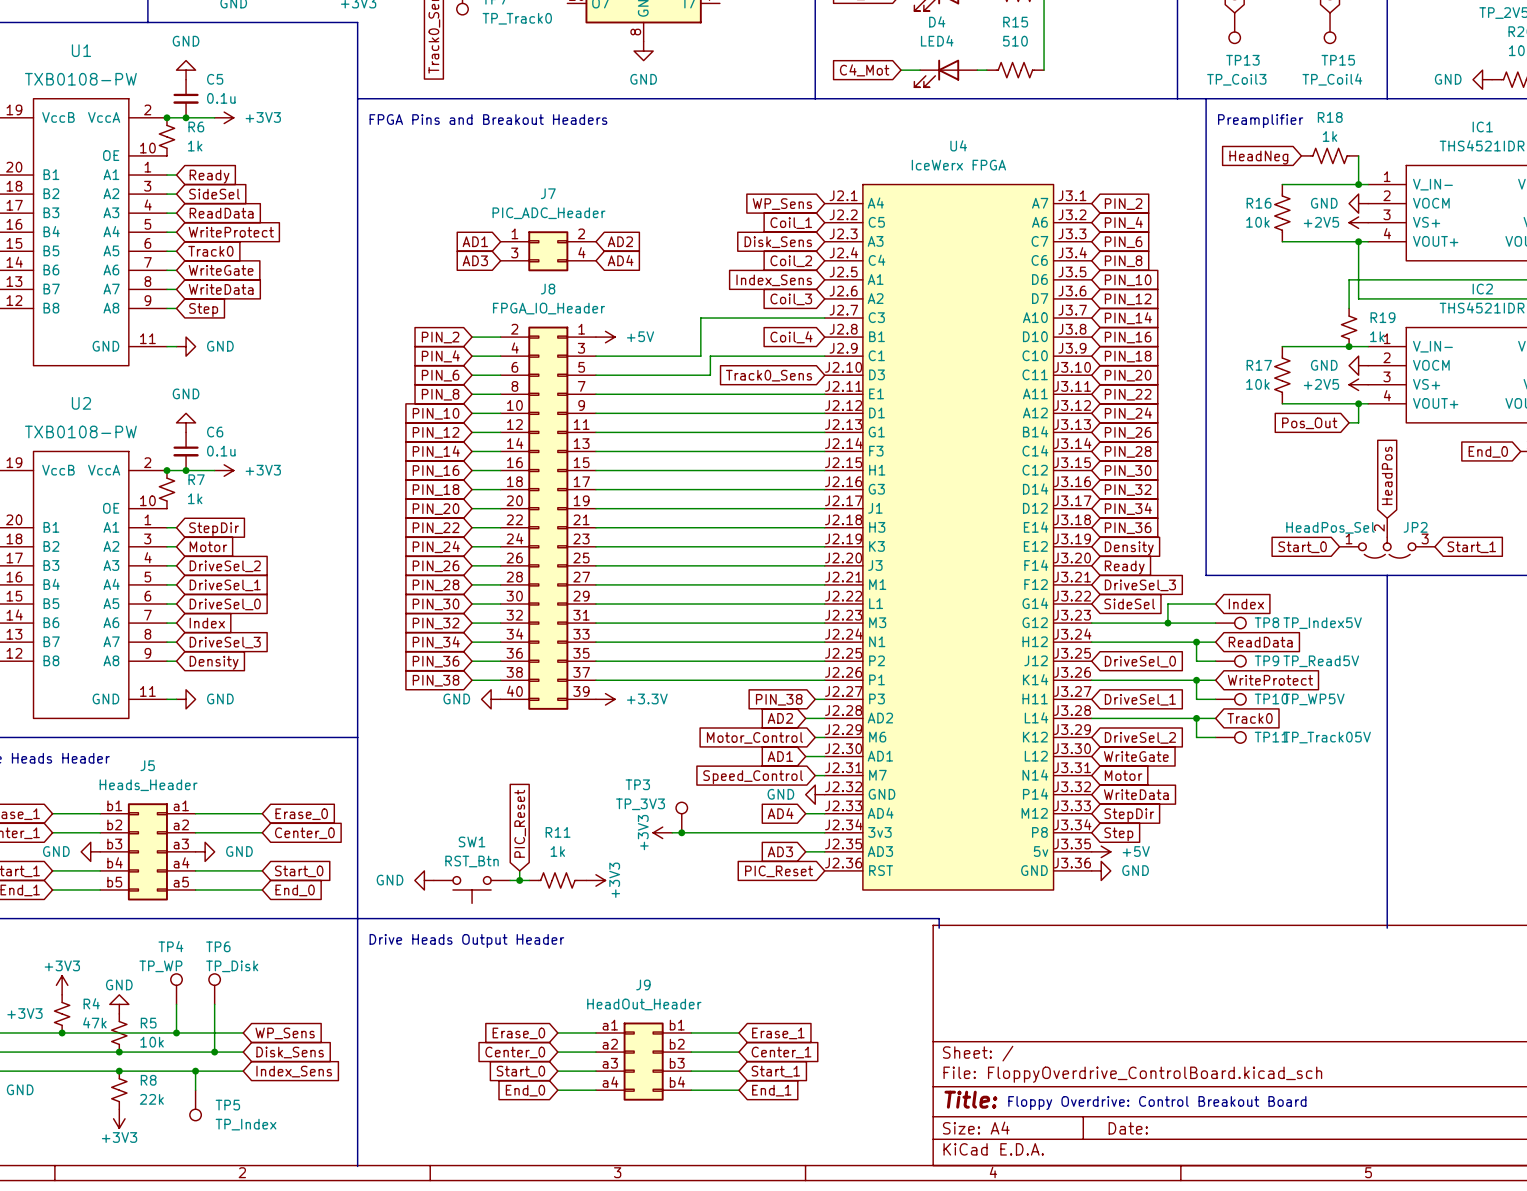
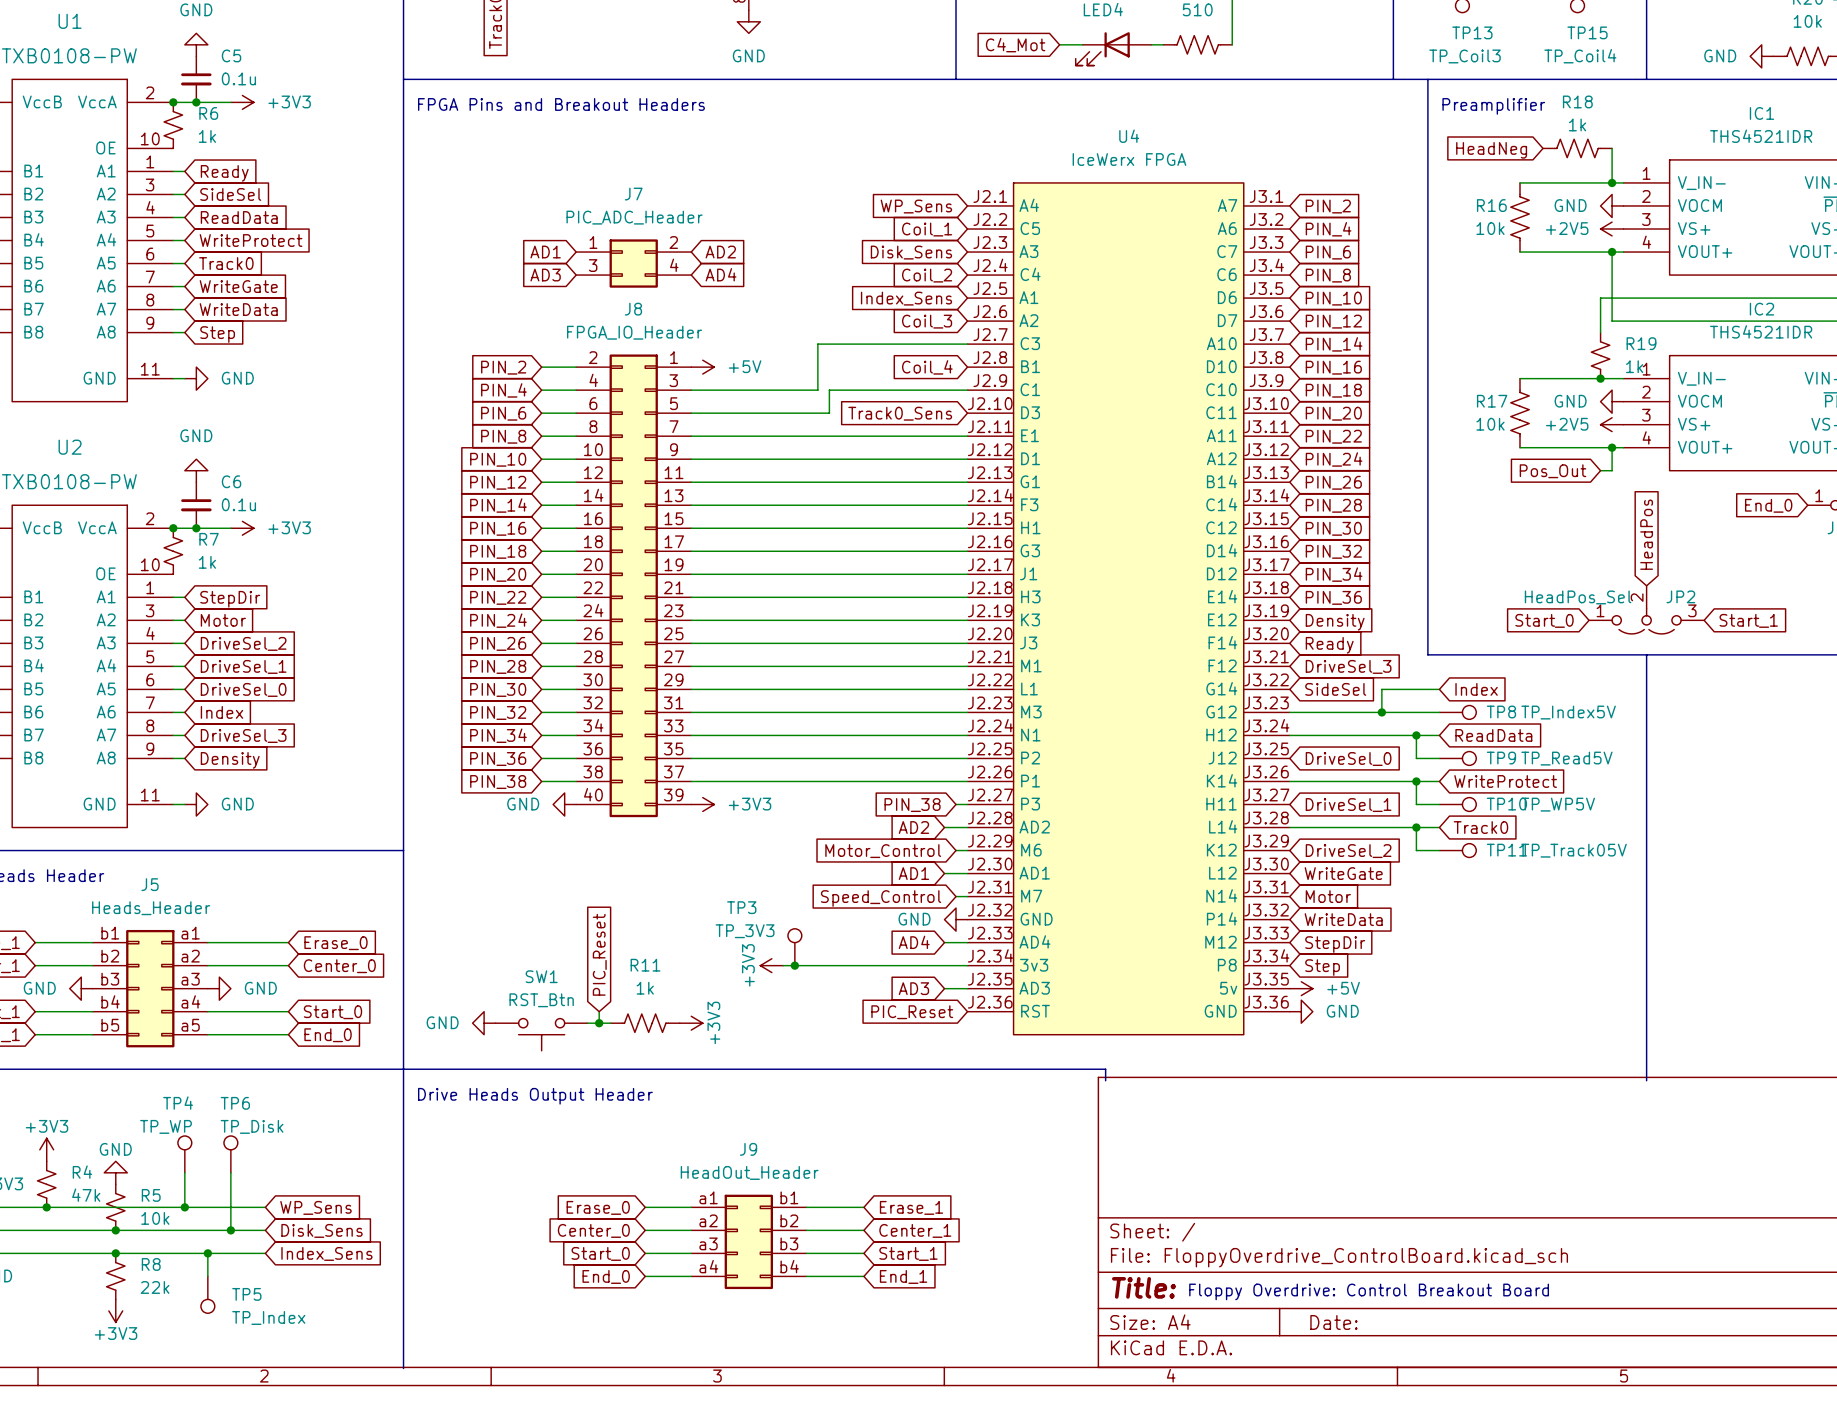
power symbol: +3.3V (605, 699) -> +3V3 (702, 804)

